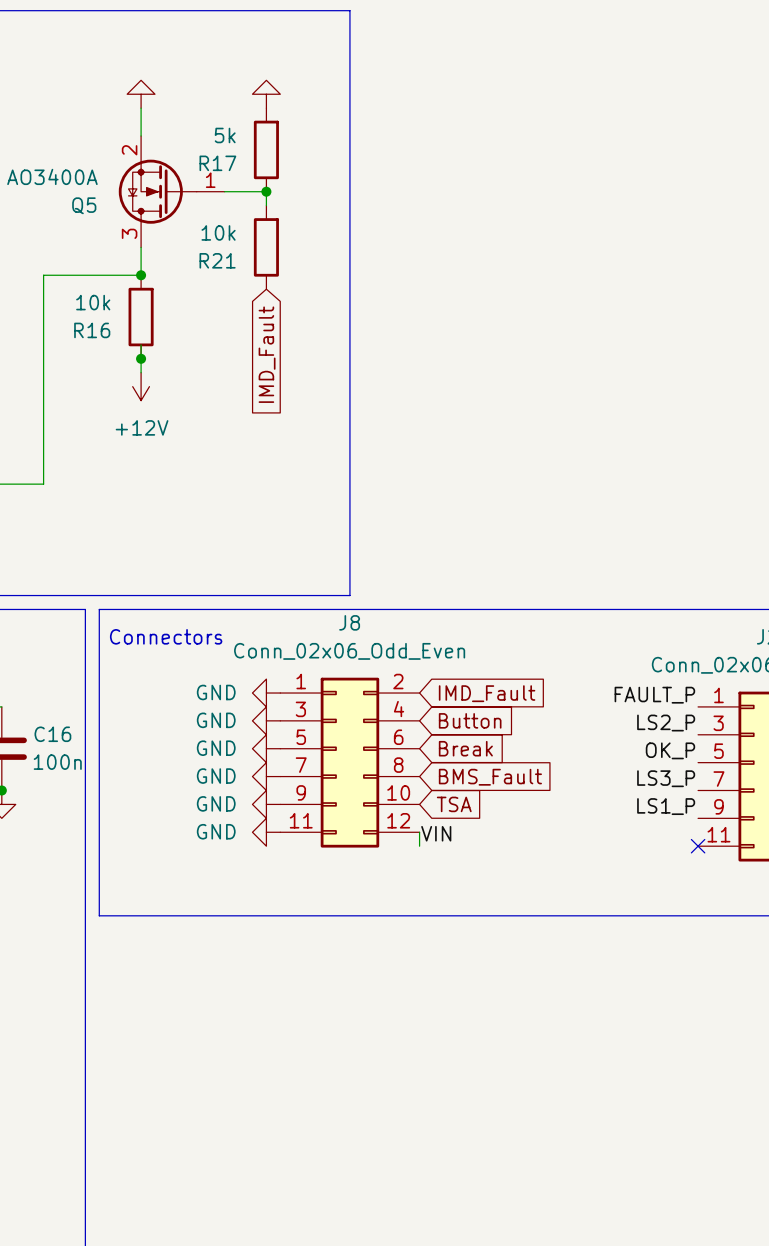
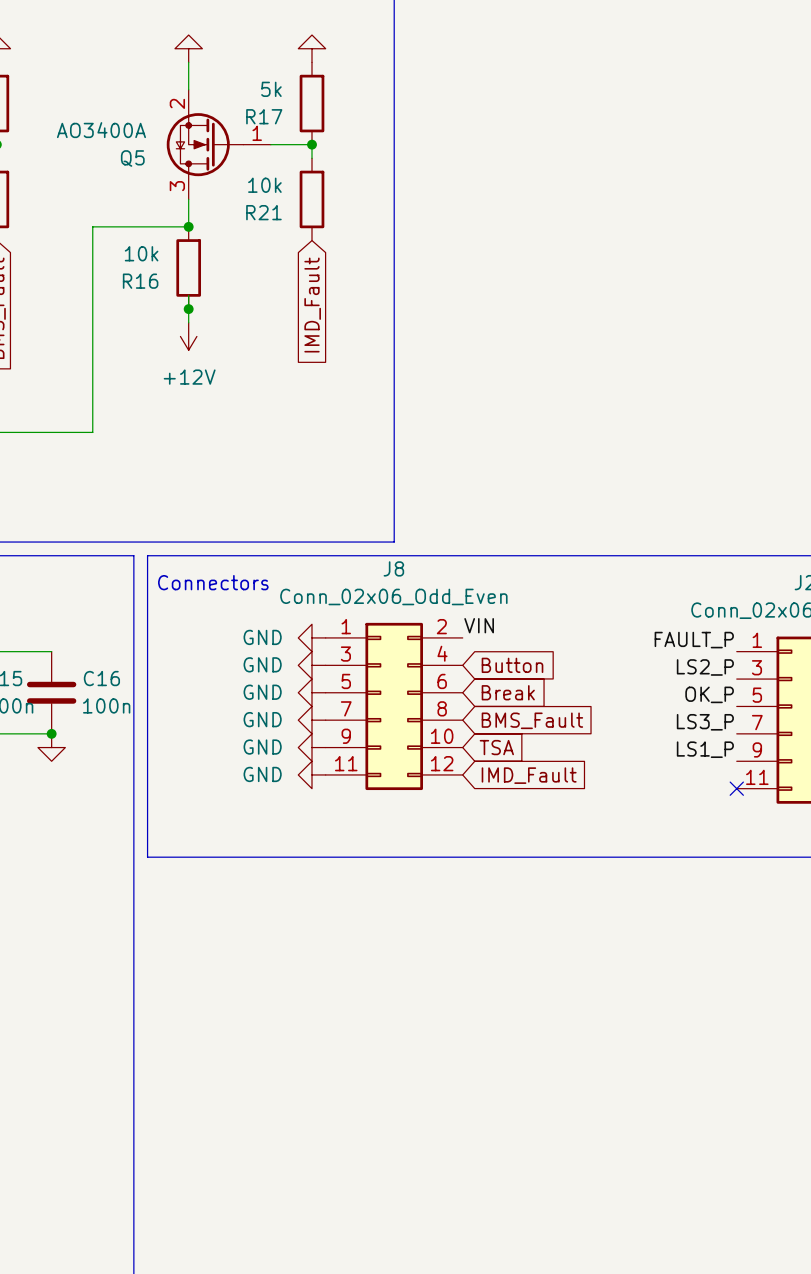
global label position: IMD_Fault (487, 693) -> IMD_Fault (529, 775)
wire: (419, 832) (419, 846) -> none
label position: VIN (436, 833) -> VIN (479, 625)

